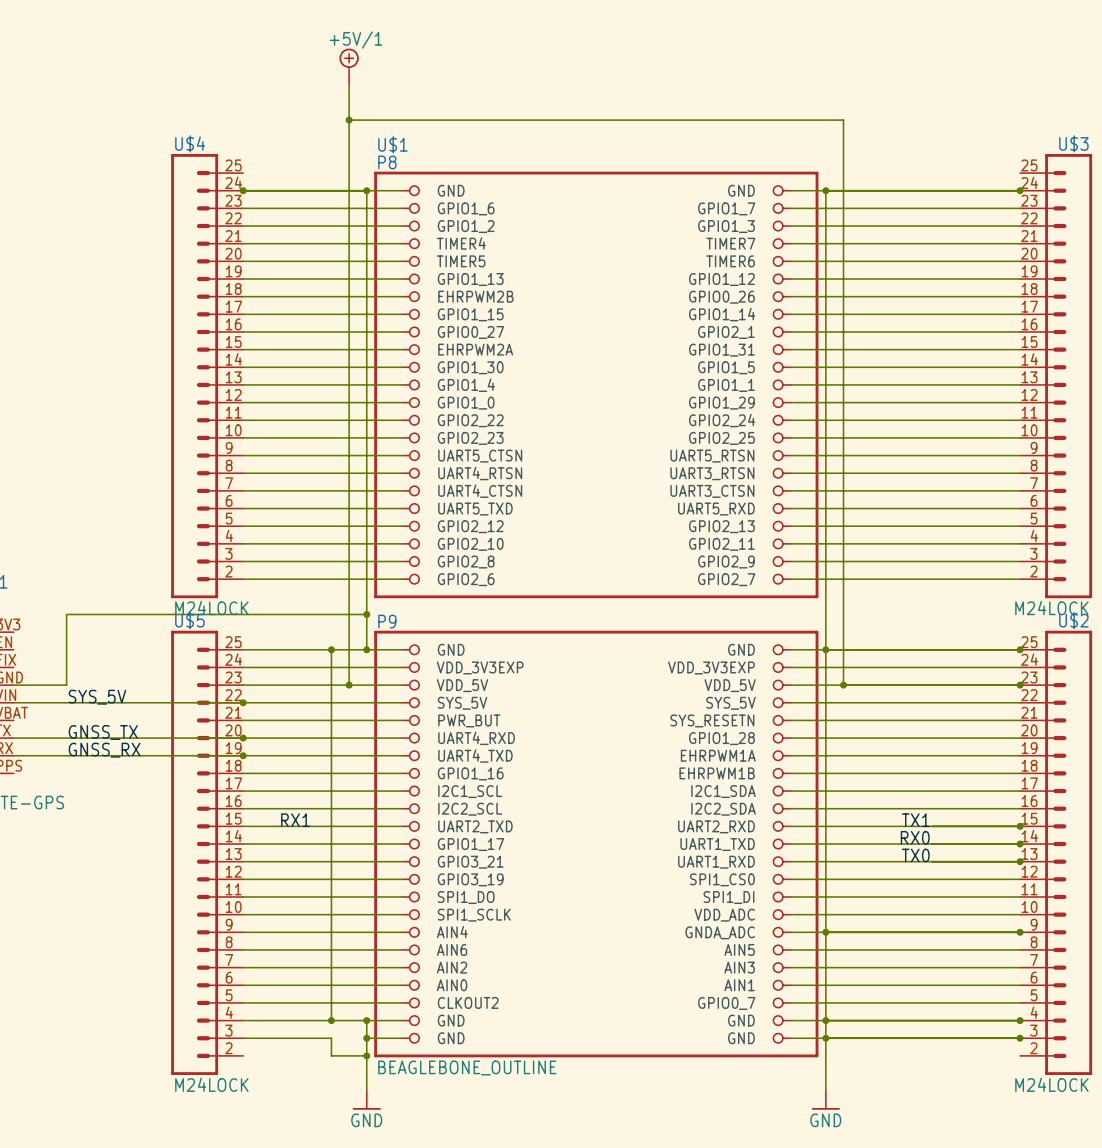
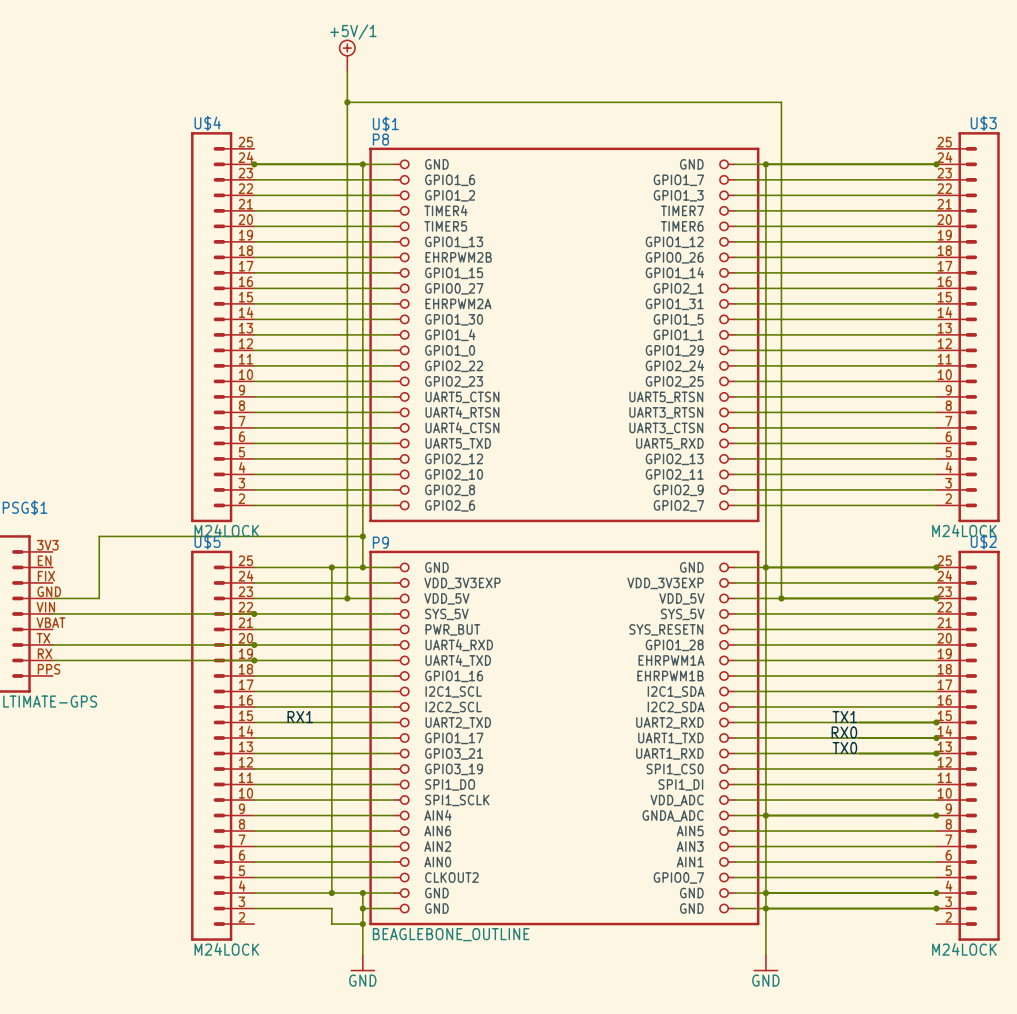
label: SYS_5V (97, 697) -> none
label: GNSS_TX (103, 732) -> none
label: GNSS_RX (104, 750) -> none

